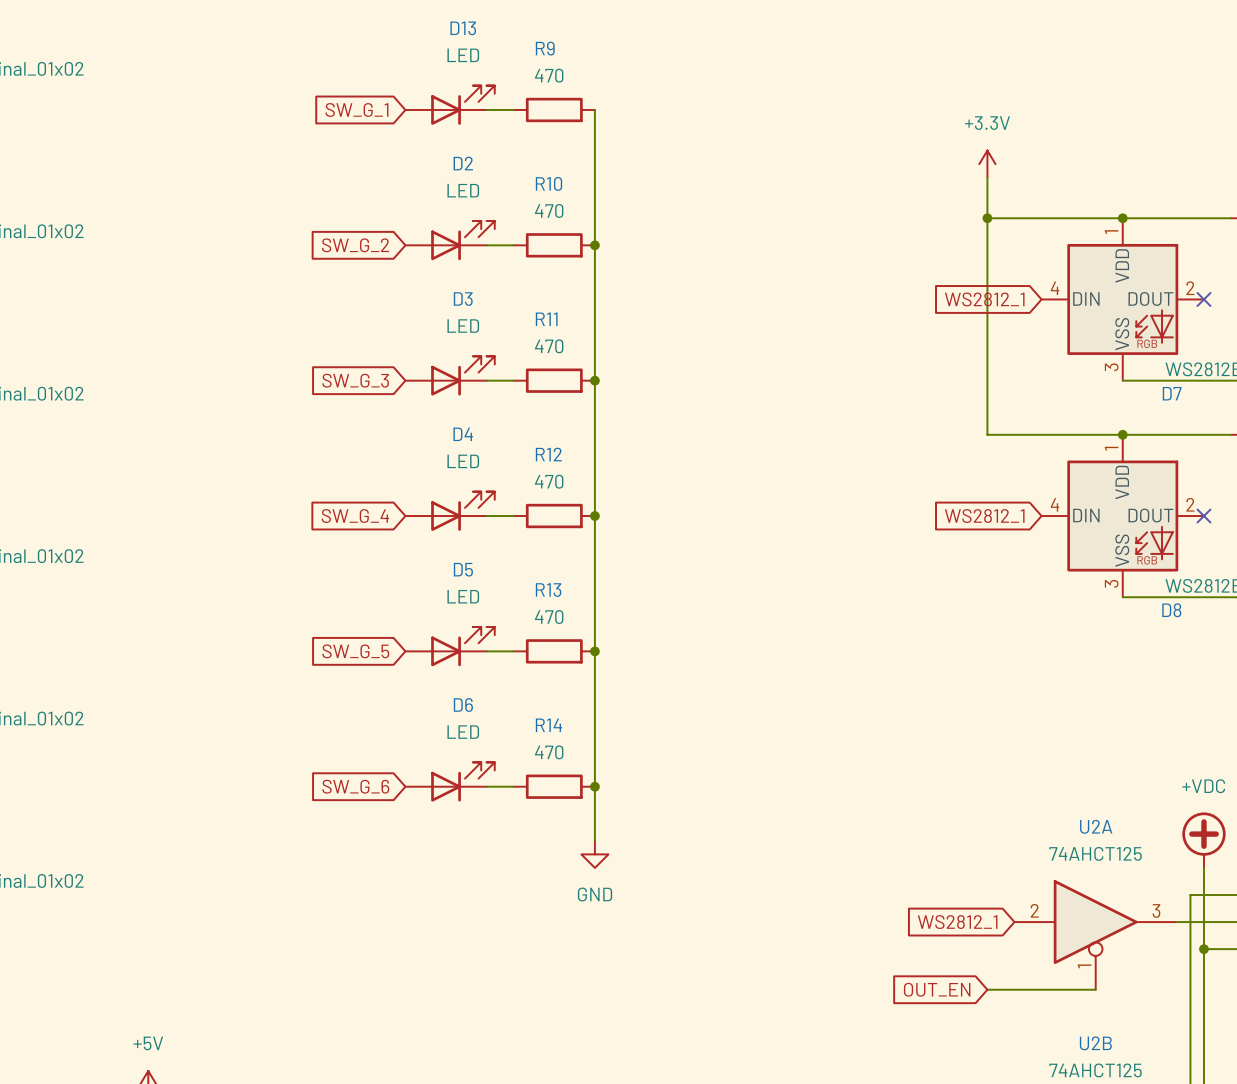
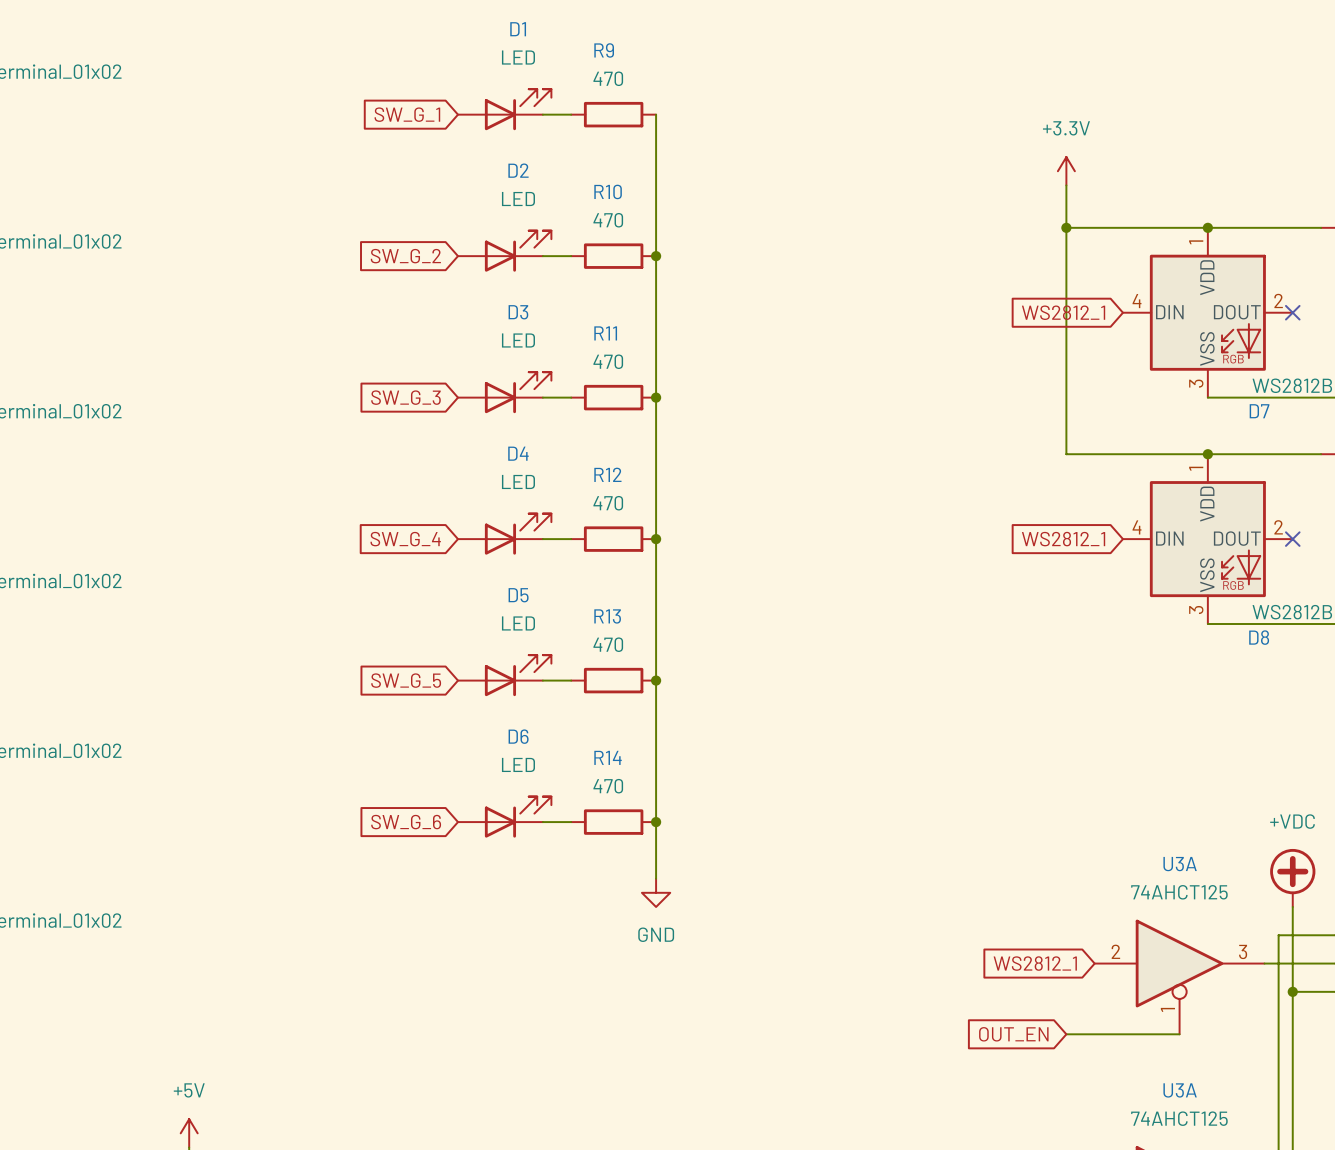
D13 name: D13 (463, 28) -> D1 (518, 29)
U2A name: U2A (1096, 826) -> U3A (1180, 864)
U2B name: U2B (1095, 1043) -> U3A (1180, 1090)

